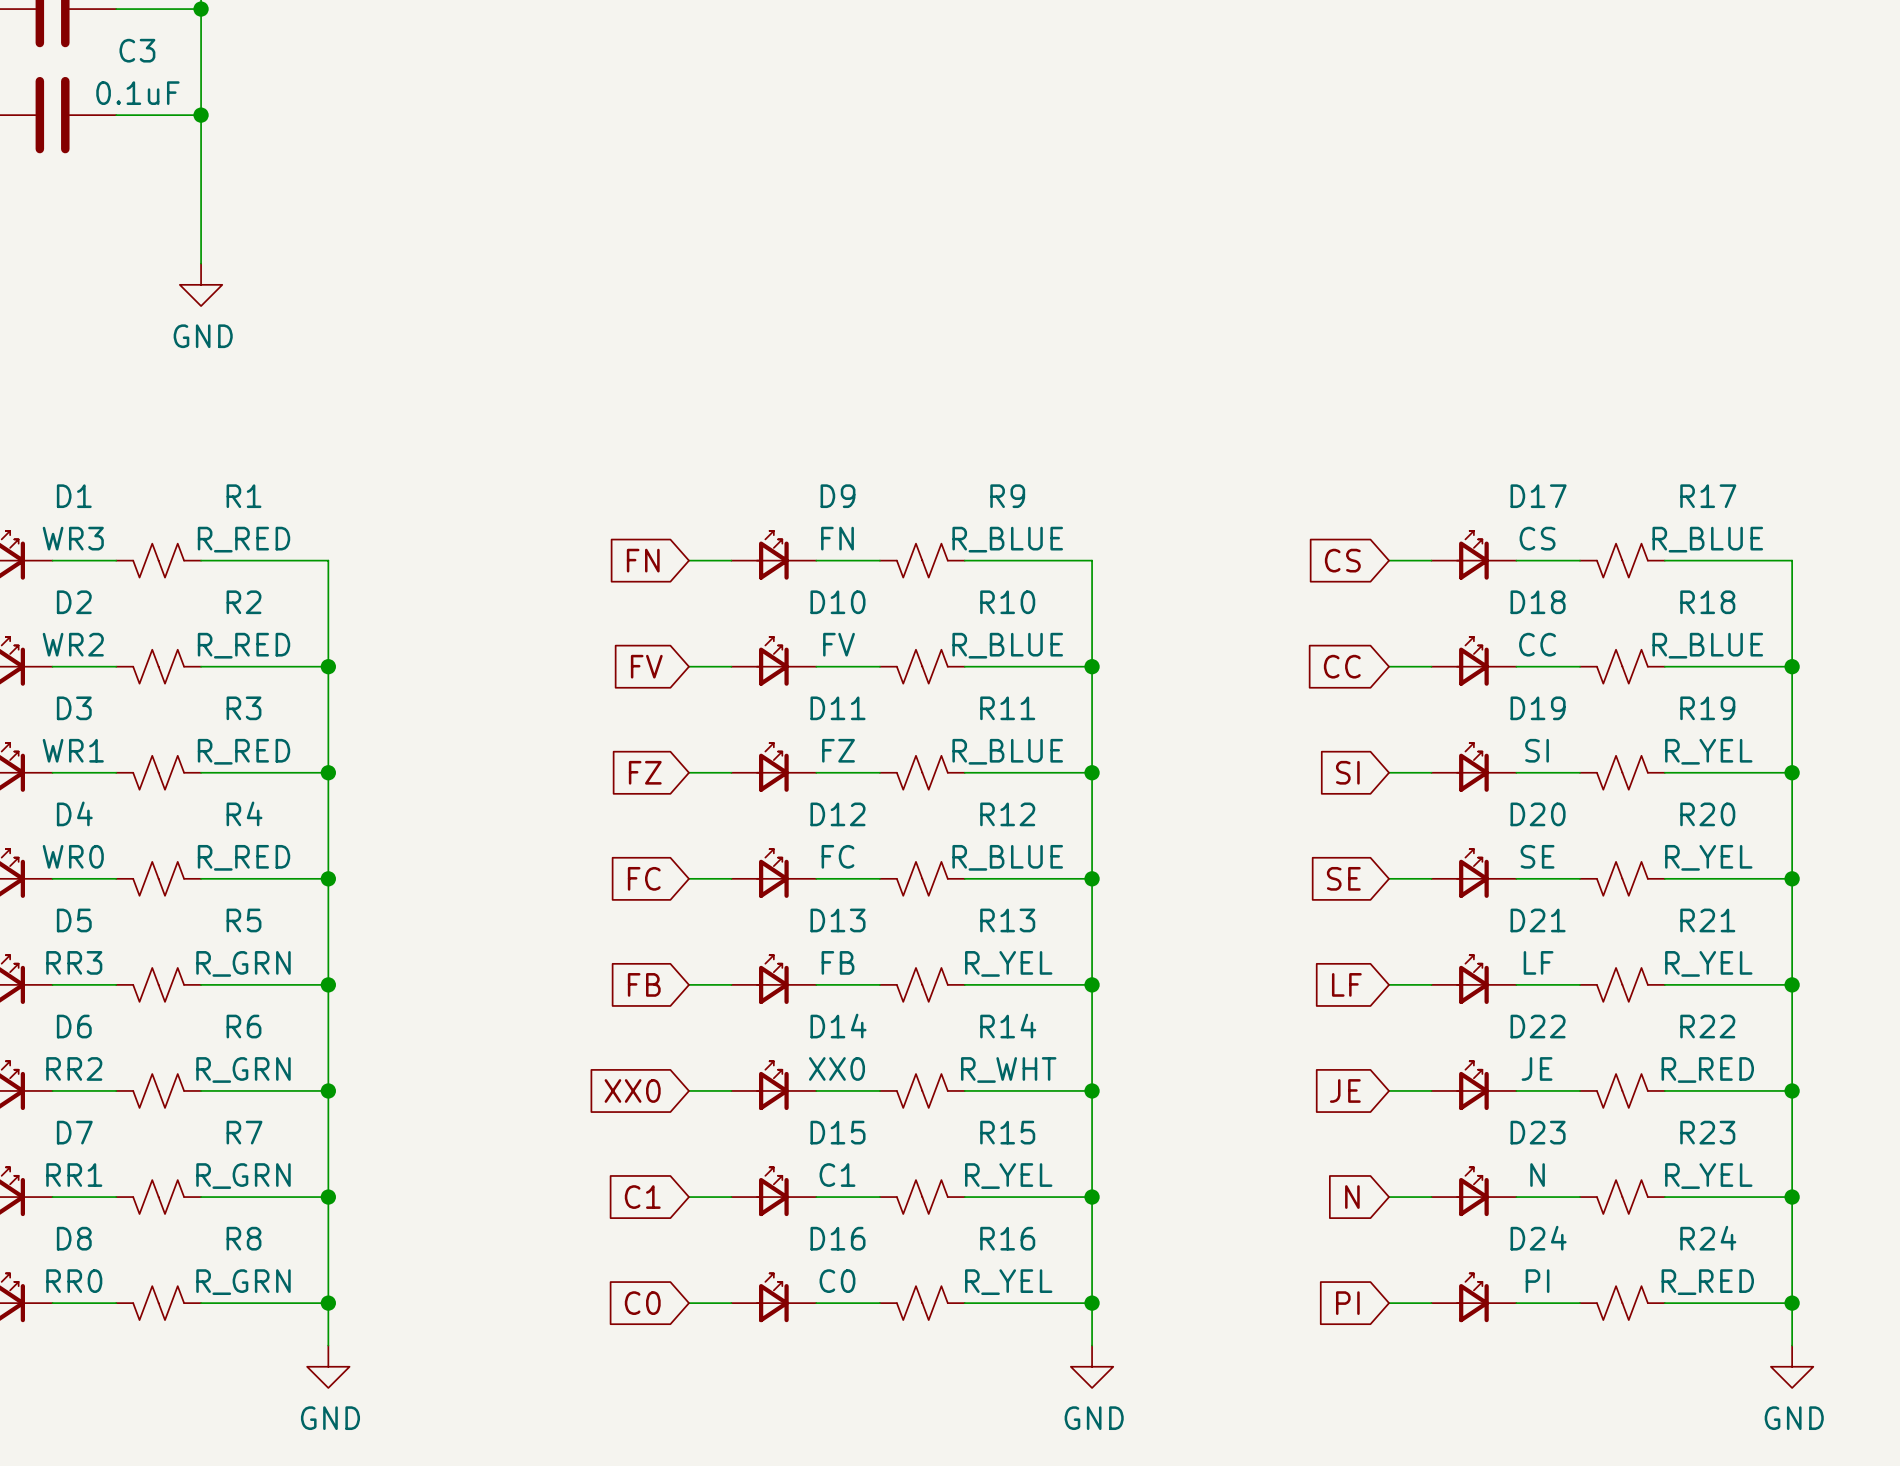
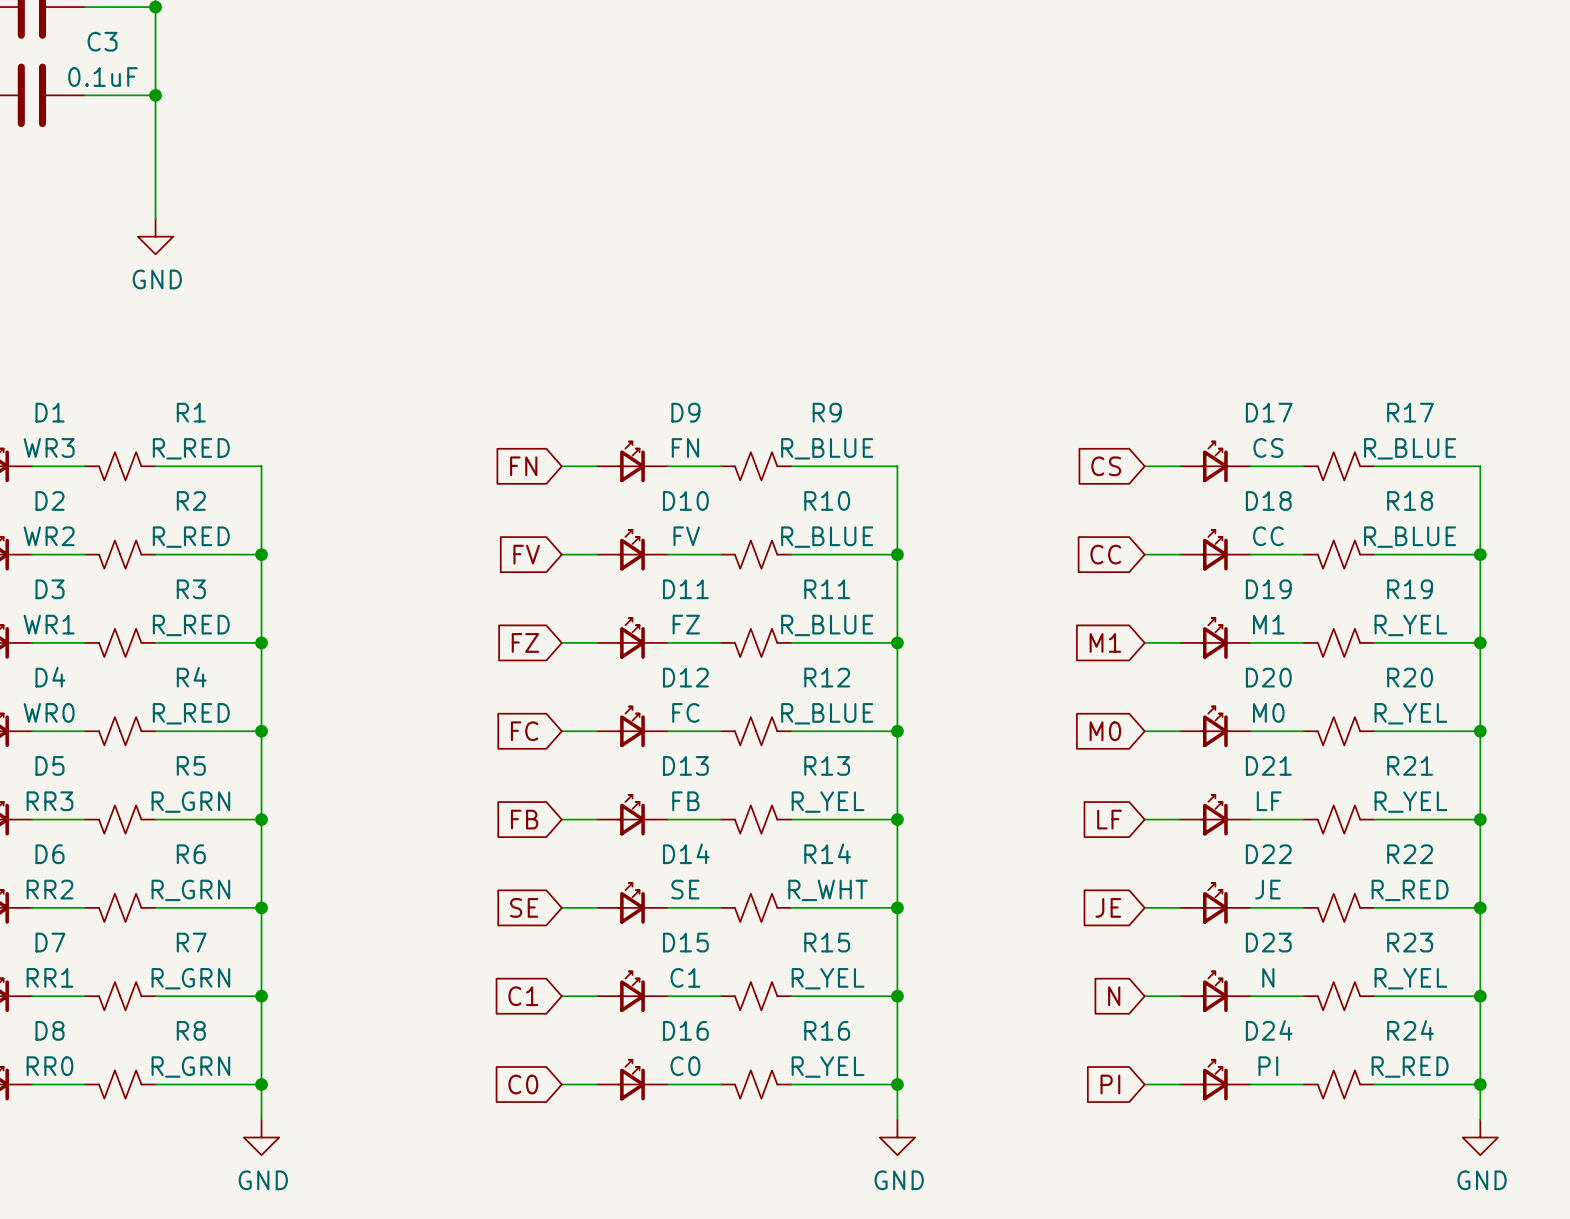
D19 value: SI (1537, 750) -> M1 (1268, 624)
global label: SI (1347, 772) -> M1 (1105, 642)
D20 value: SE (1537, 856) -> M0 (1268, 712)
global label: SE (1343, 878) -> M0 (1105, 731)
D14 value: XX0 (836, 1068) -> SE (685, 889)
global label: XX0 (632, 1090) -> SE (524, 907)

